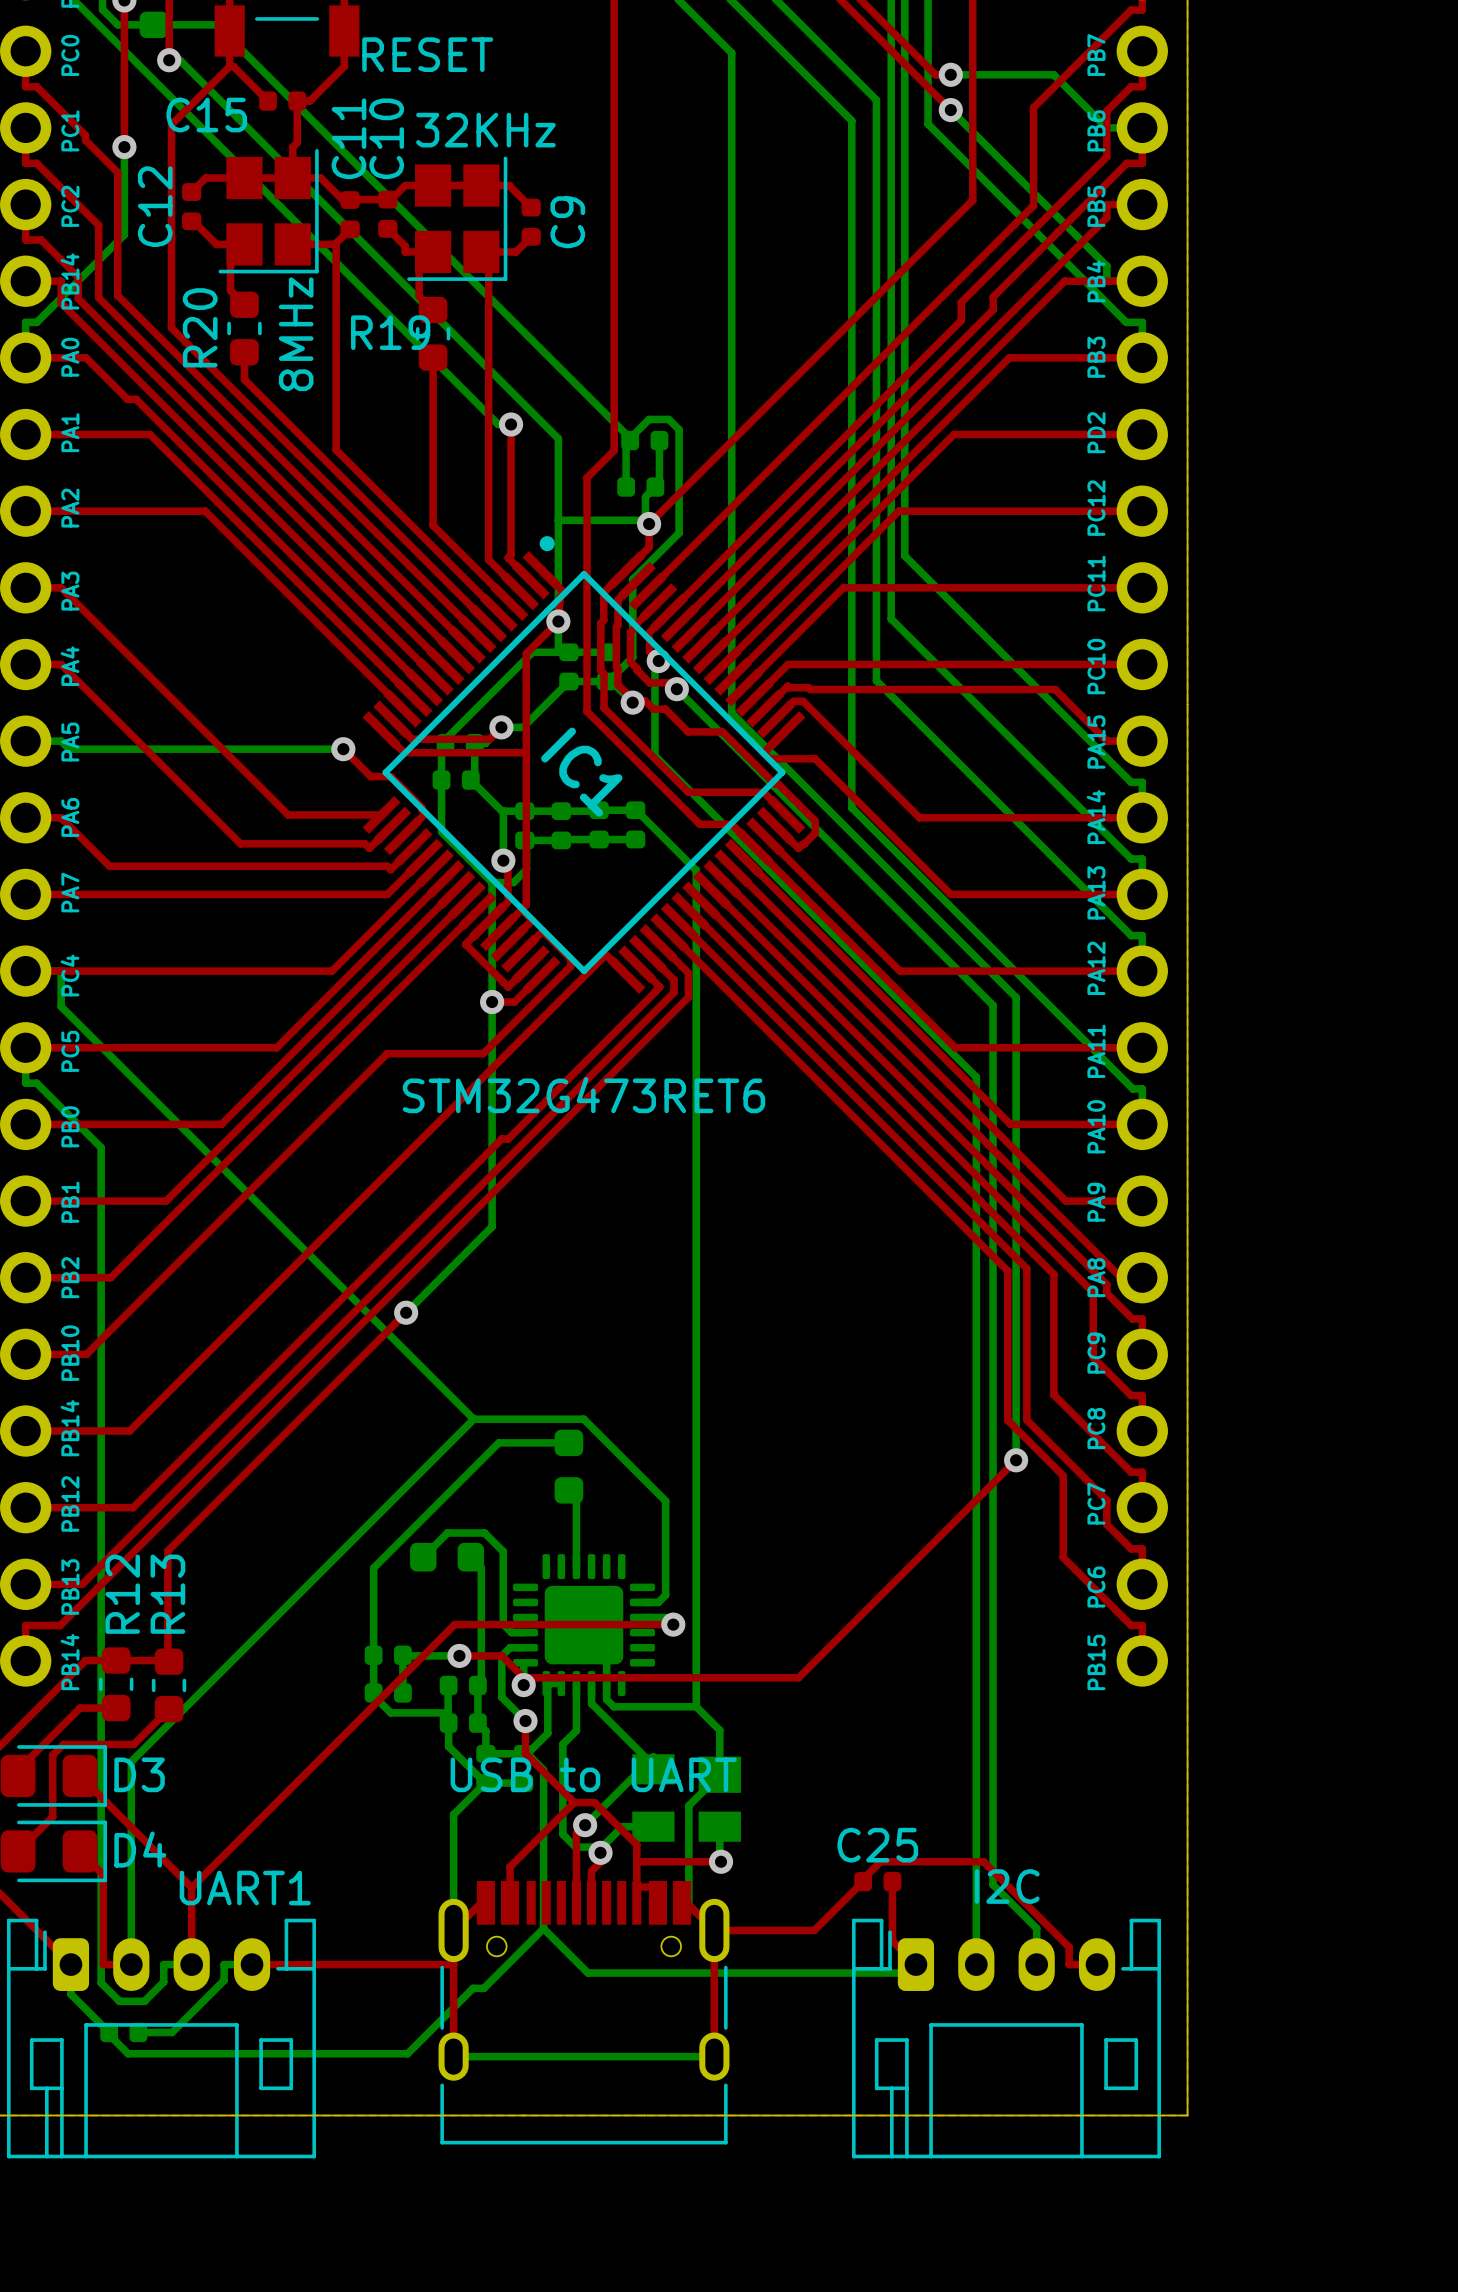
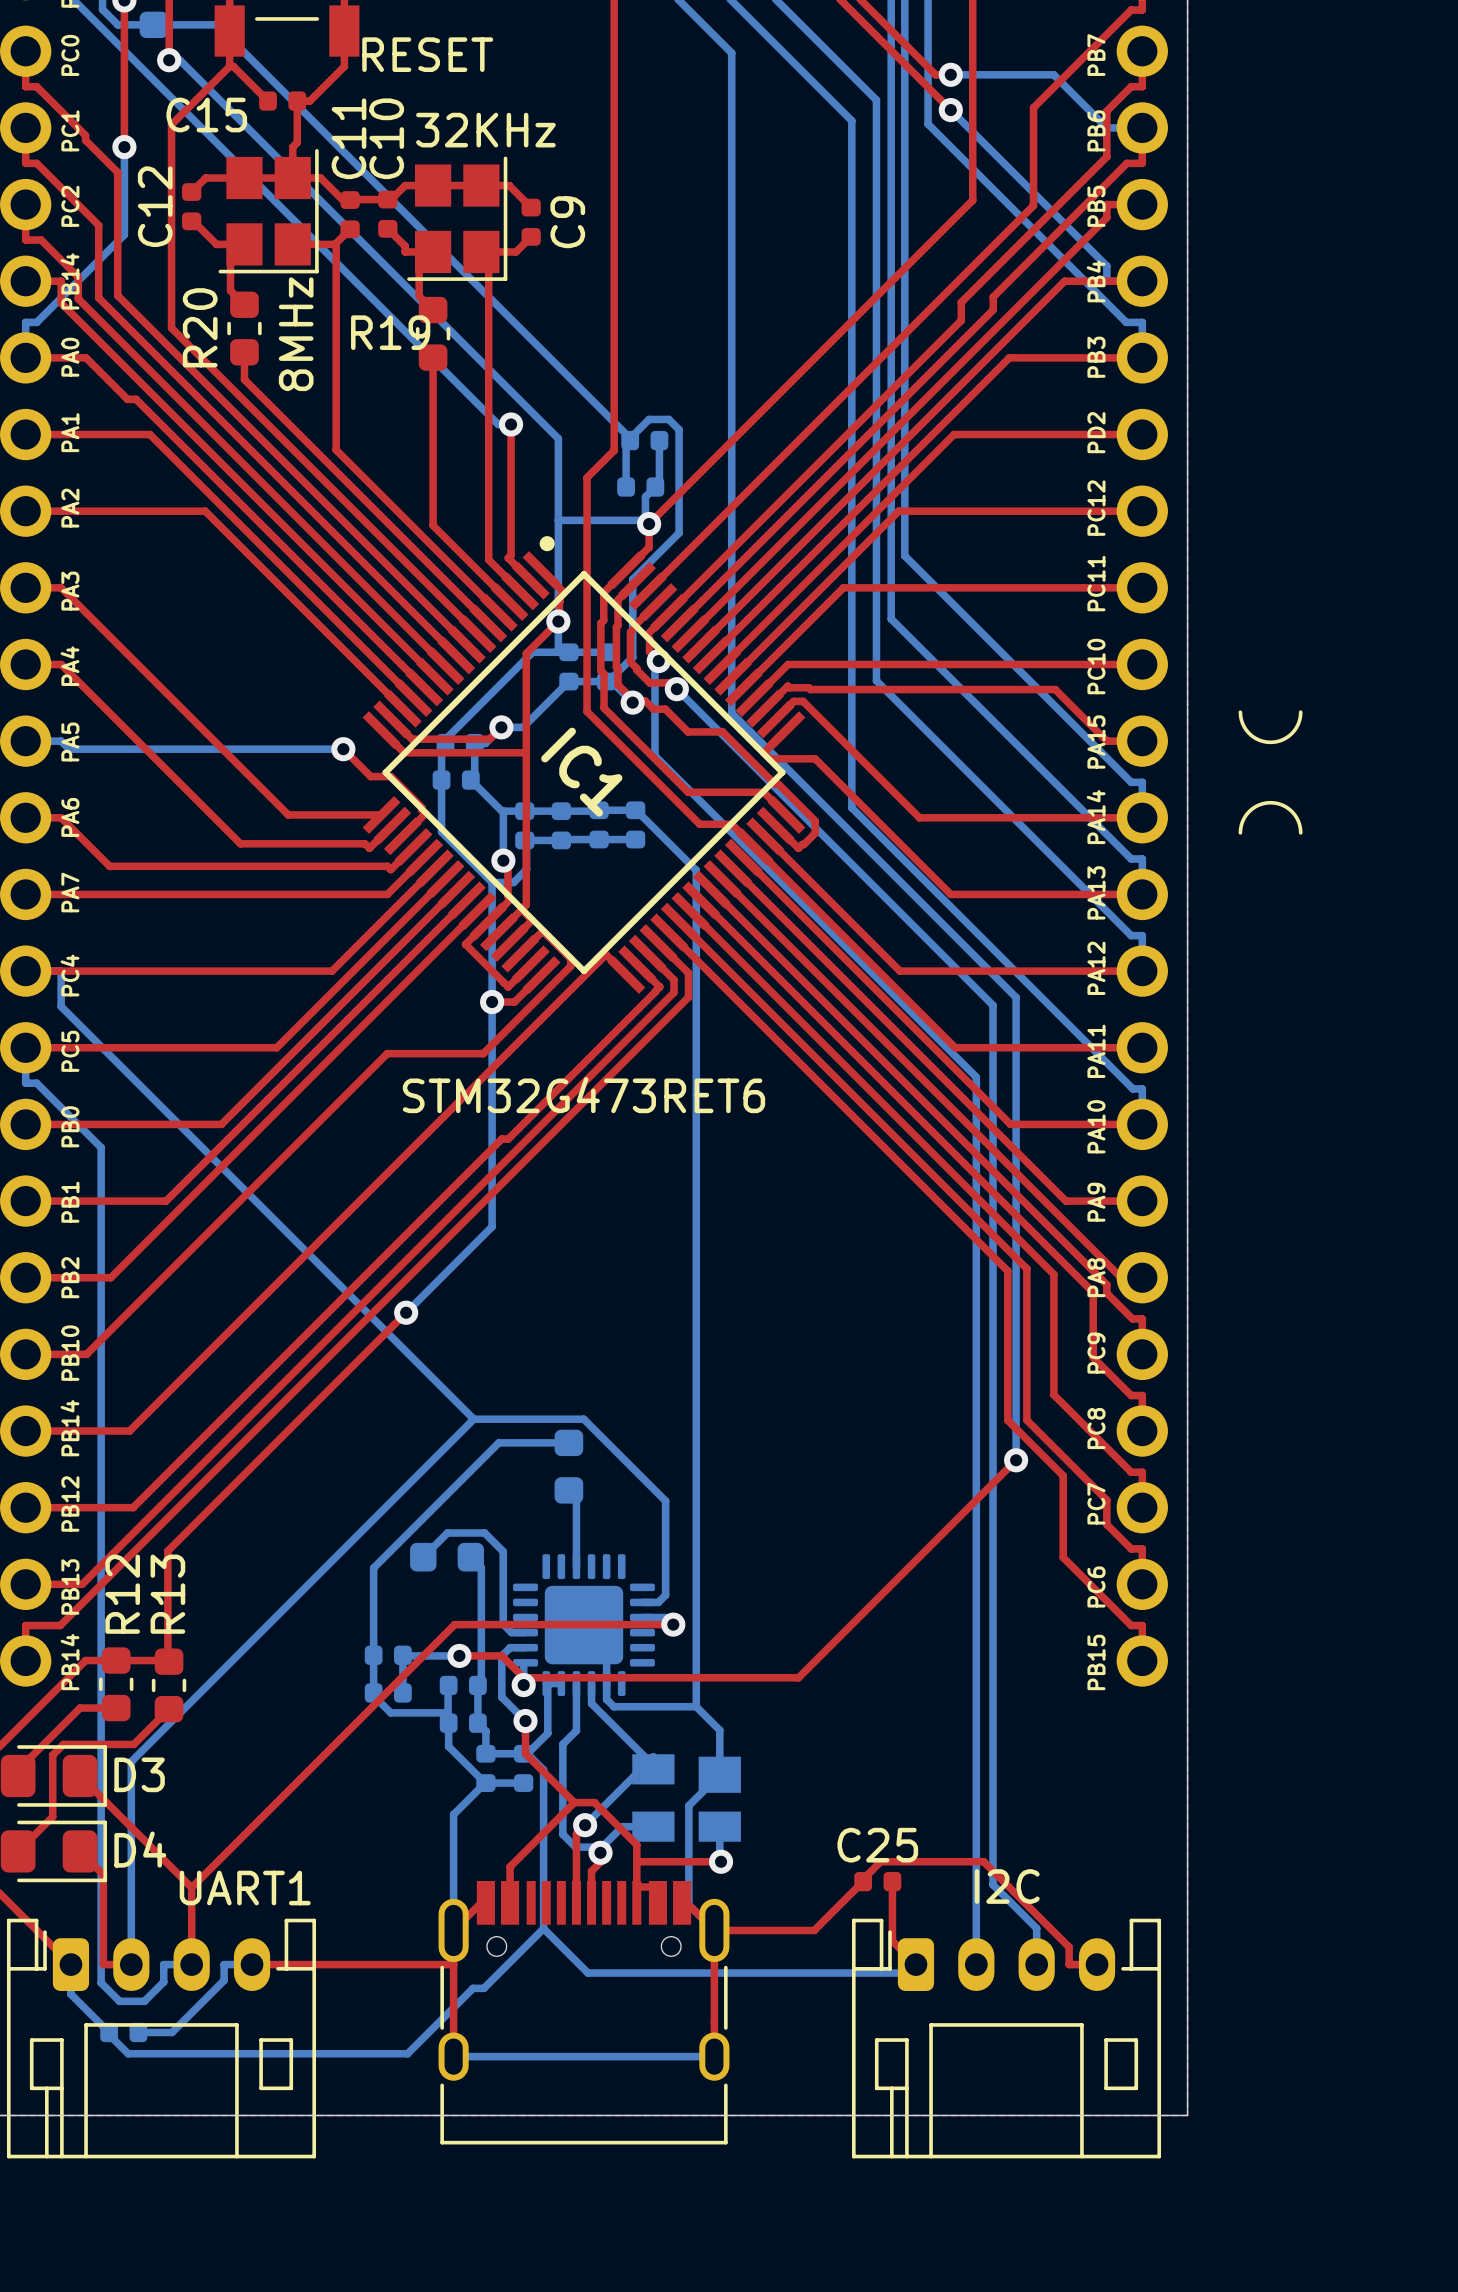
line: none -> (1240, 712) (1242, 723) (1249, 733) (1259, 740) (1270, 742) (1282, 740) (1291, 733) (1298, 723) (1300, 712)
line: none -> (1240, 832) (1242, 821) (1249, 811) (1259, 805) (1270, 802) (1282, 805) (1291, 811) (1298, 821) (1300, 832)
drawing: [450, 1757, 737, 1793] -> none

